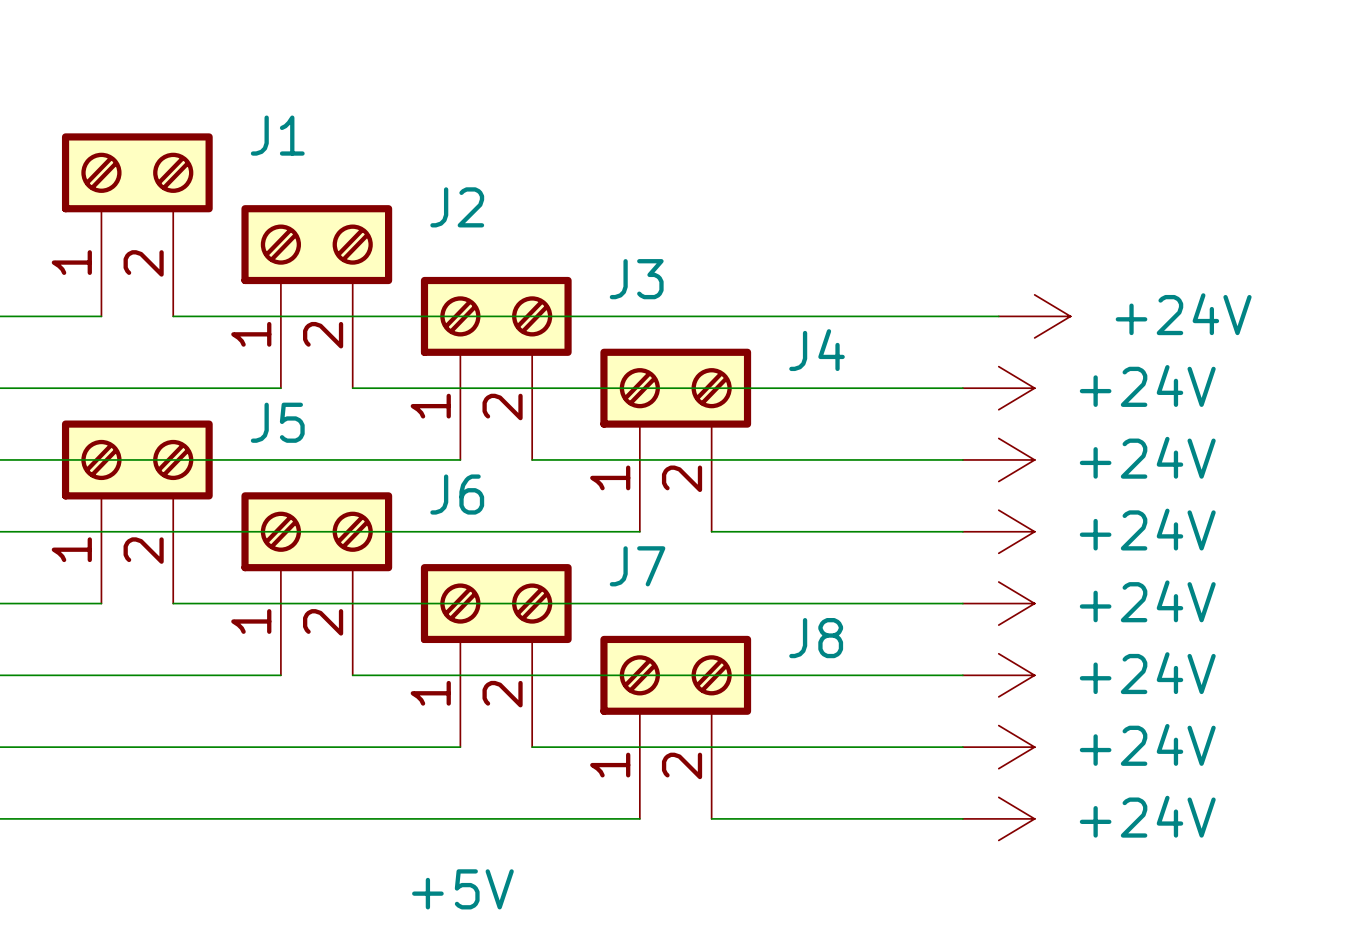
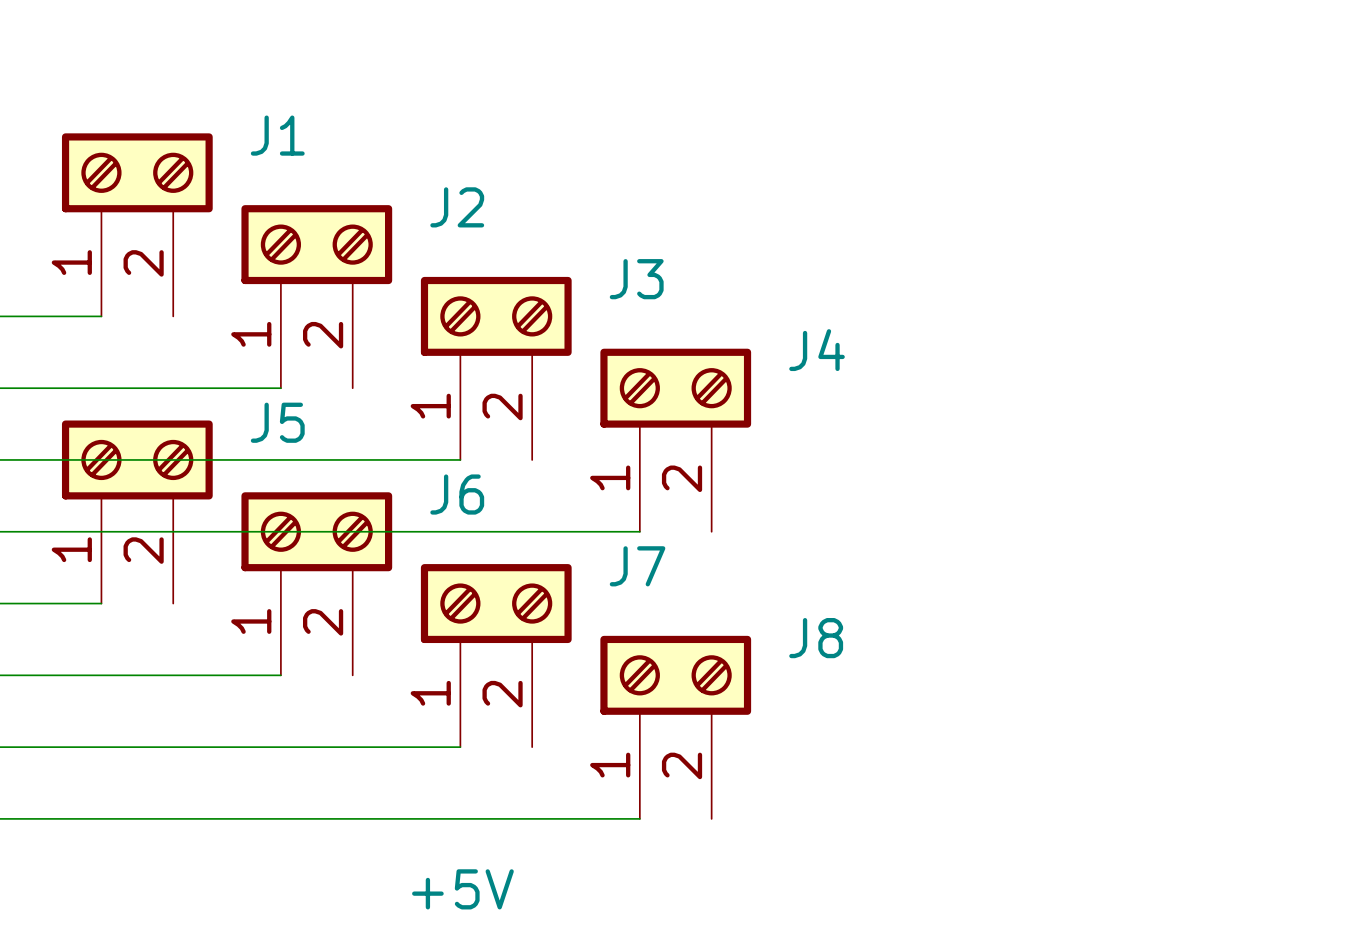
wire: (173, 316) (998, 316) -> none
power symbol: +24V (1034, 316) -> none
wire: (352, 388) (962, 388) -> none
power symbol: +24V (998, 388) -> none
wire: (532, 459) (962, 459) -> none
power symbol: +24V (998, 459) -> none
wire: (711, 531) (962, 531) -> none
power symbol: +24V (998, 531) -> none
wire: (173, 603) (962, 603) -> none
power symbol: +24V (998, 603) -> none
wire: (352, 675) (962, 675) -> none
power symbol: +24V (998, 675) -> none
wire: (532, 747) (962, 747) -> none
power symbol: +24V (998, 747) -> none
wire: (711, 818) (962, 818) -> none
power symbol: +24V (998, 818) -> none

